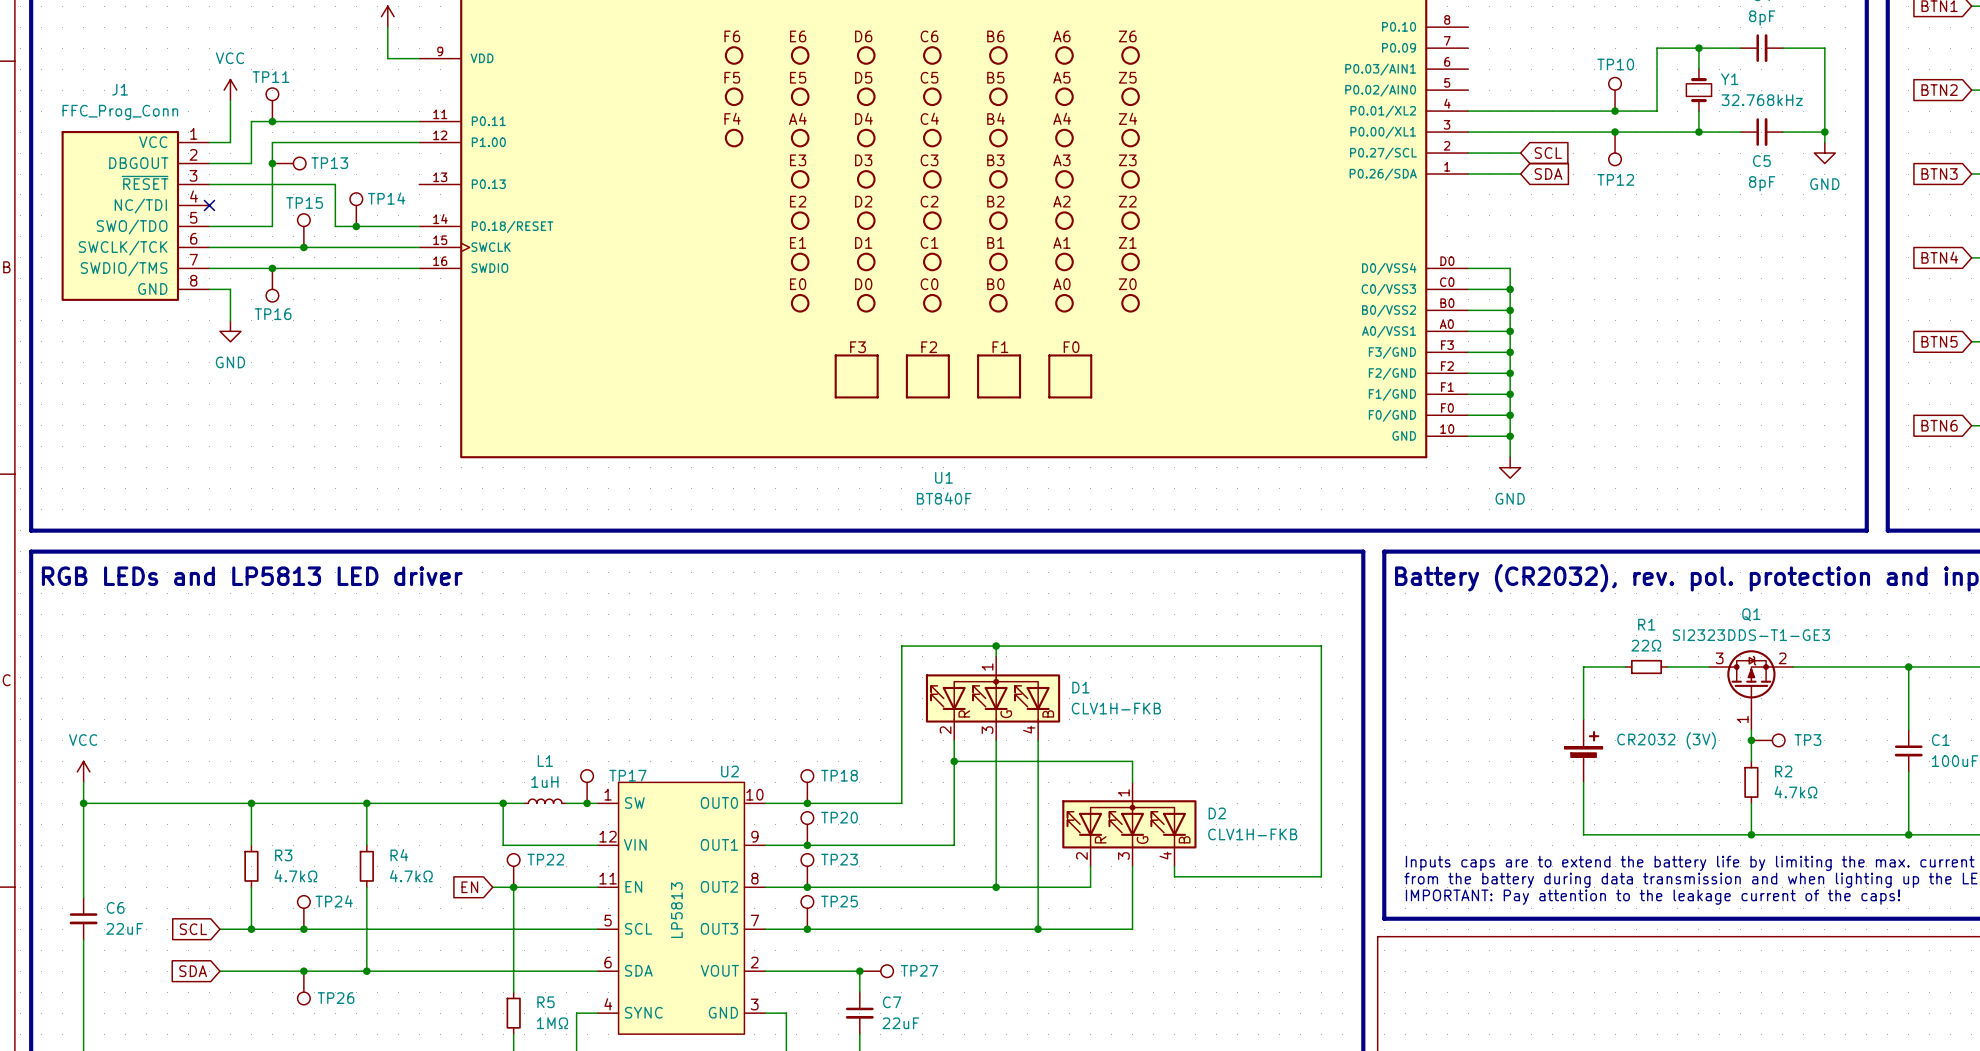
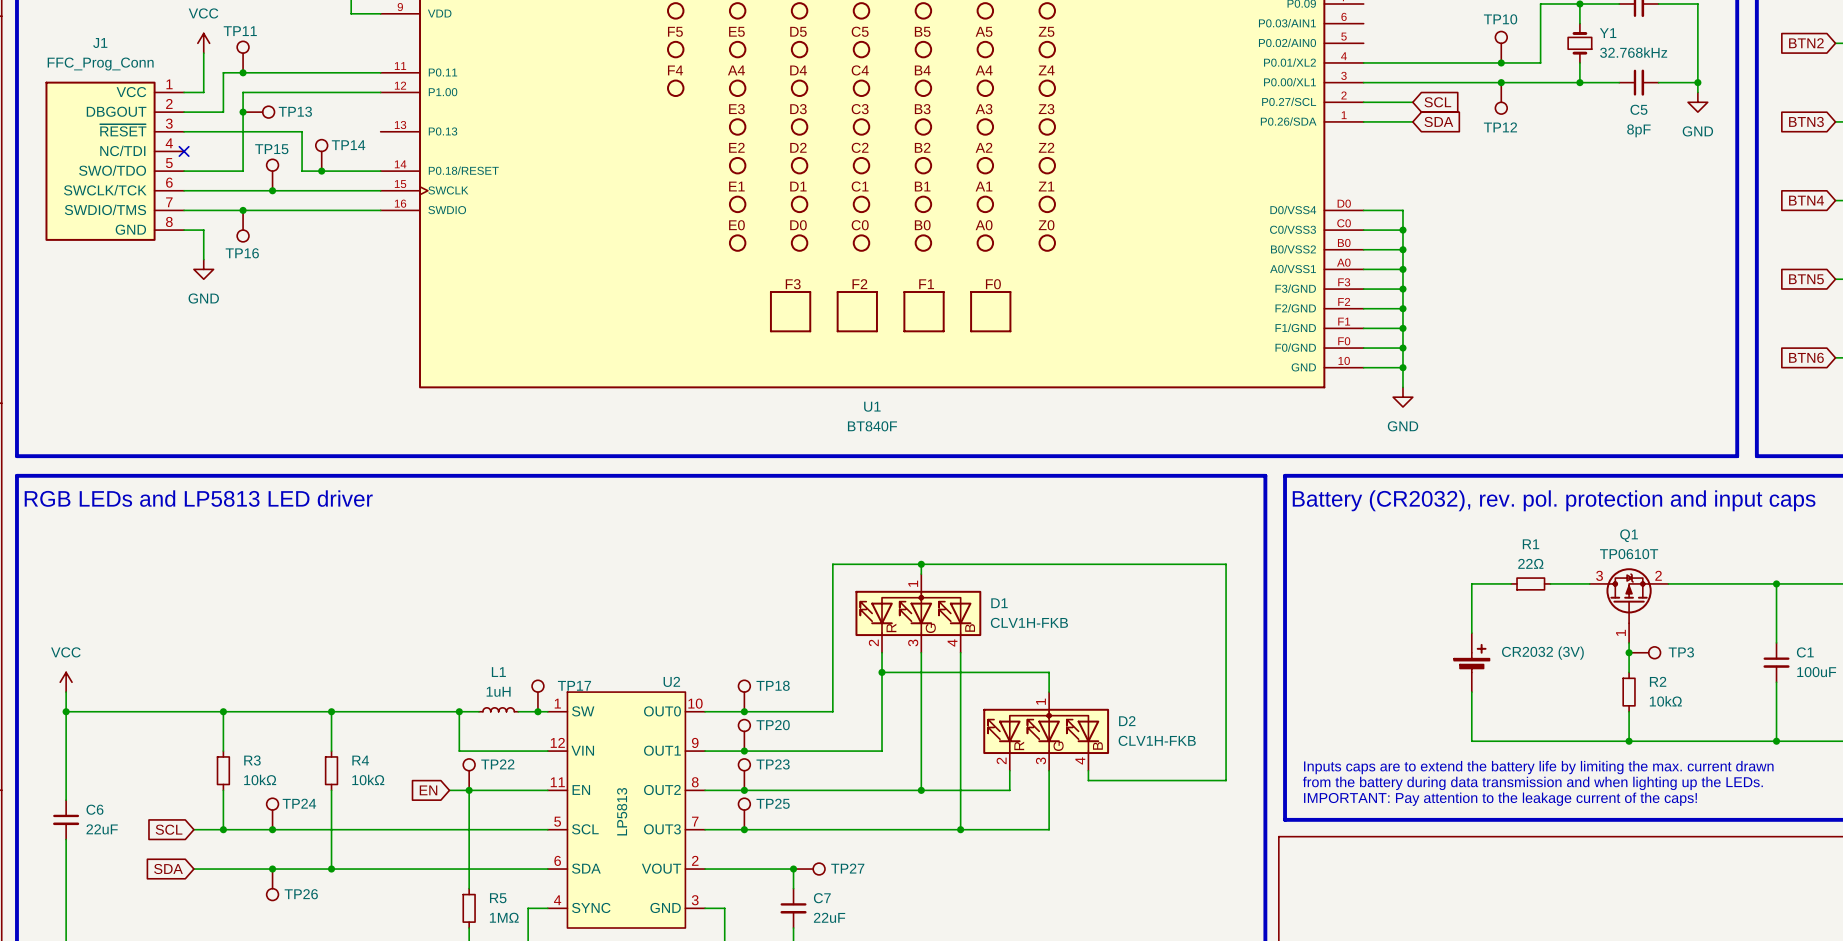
Q1 value: SI2323DDS-T1-GE3 (1751, 635) -> TP0610T (1629, 554)
R2 text: 4.7kΩ (1795, 792) -> 10kΩ (1665, 701)
R3 text: 4.7kΩ (295, 876) -> 10kΩ (260, 779)
R4 text: 4.7kΩ (411, 876) -> 10kΩ (368, 779)

